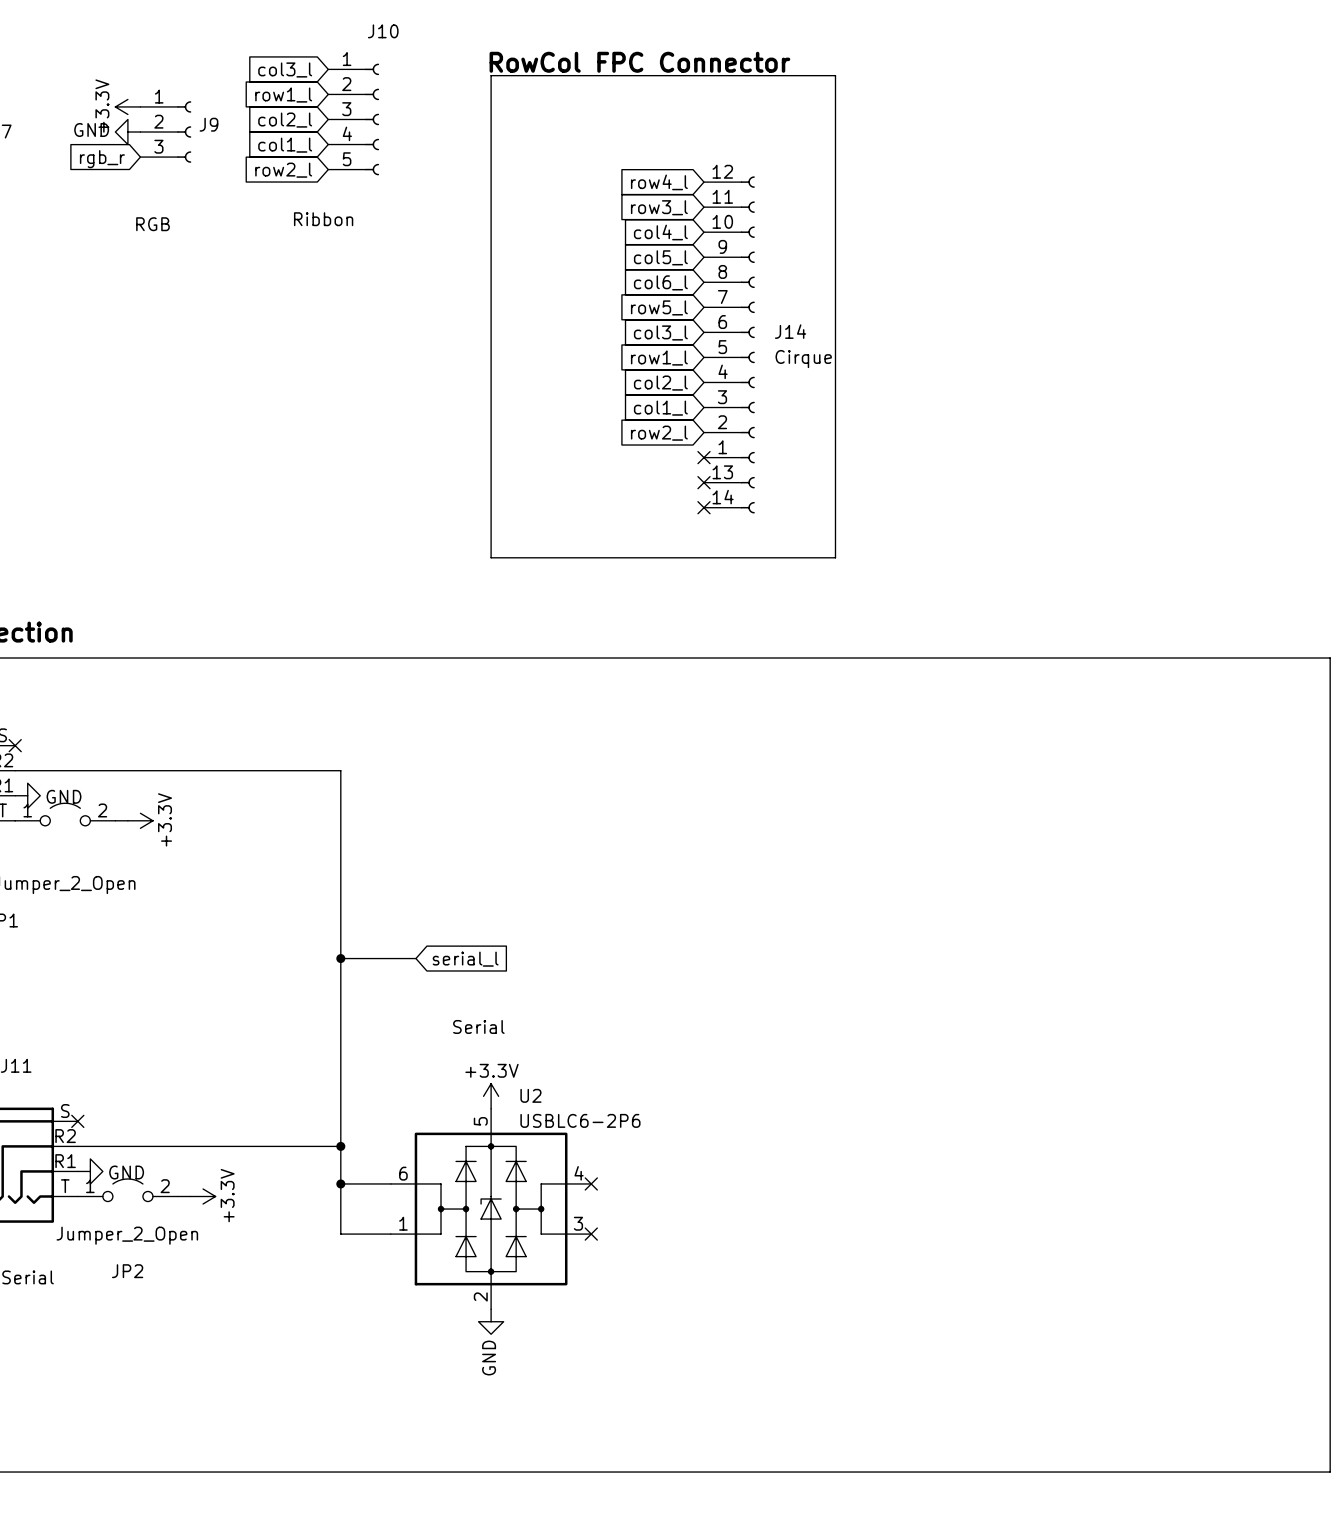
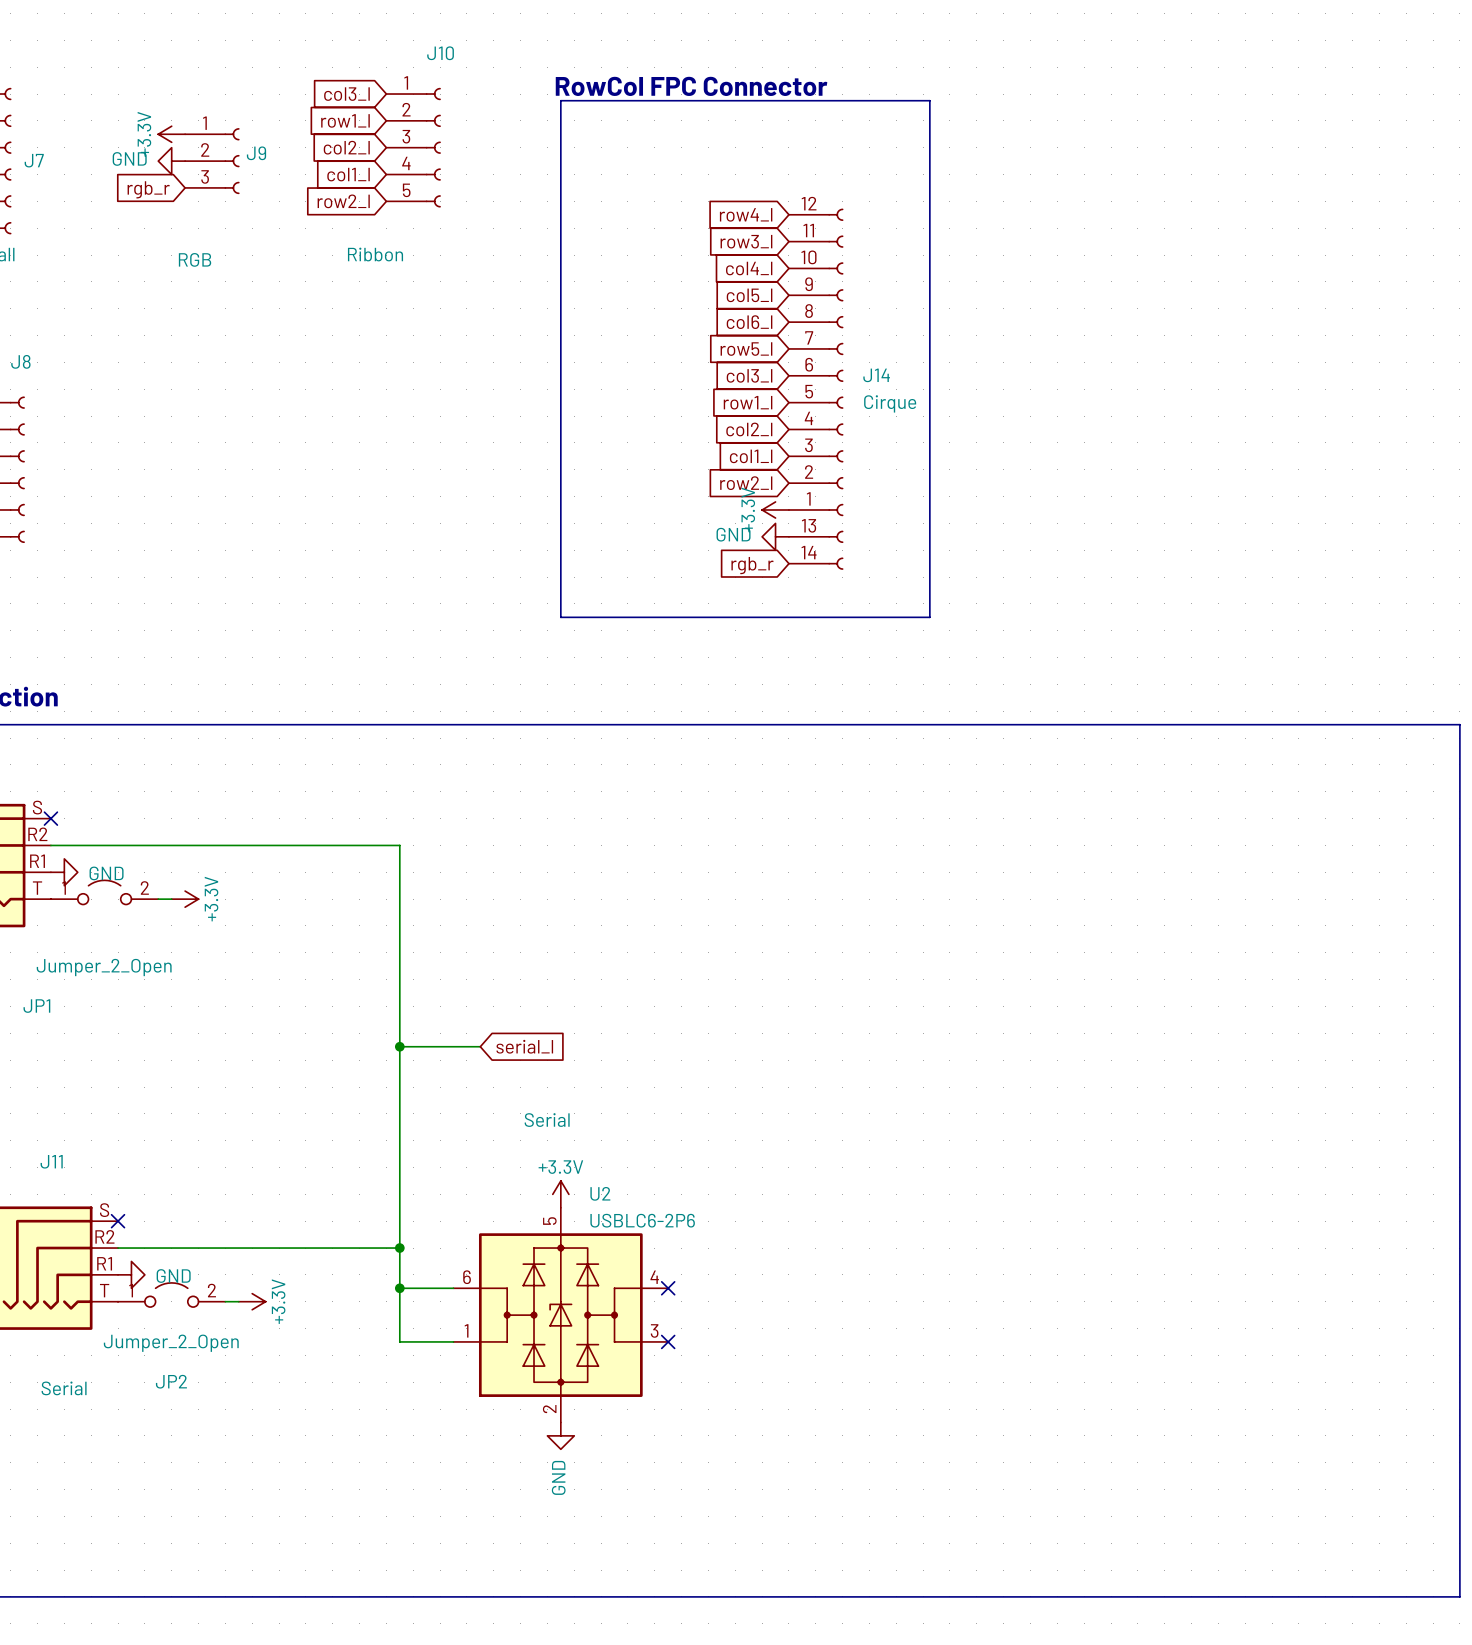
power symbol: none -> +3.3V (775, 509)
no-connect mark: (703, 457) -> none
power symbol: none -> GND (775, 536)
no-connect mark: (703, 482) -> none
no-connect mark: (703, 507) -> none
global label: none -> rgb_r (752, 565)

